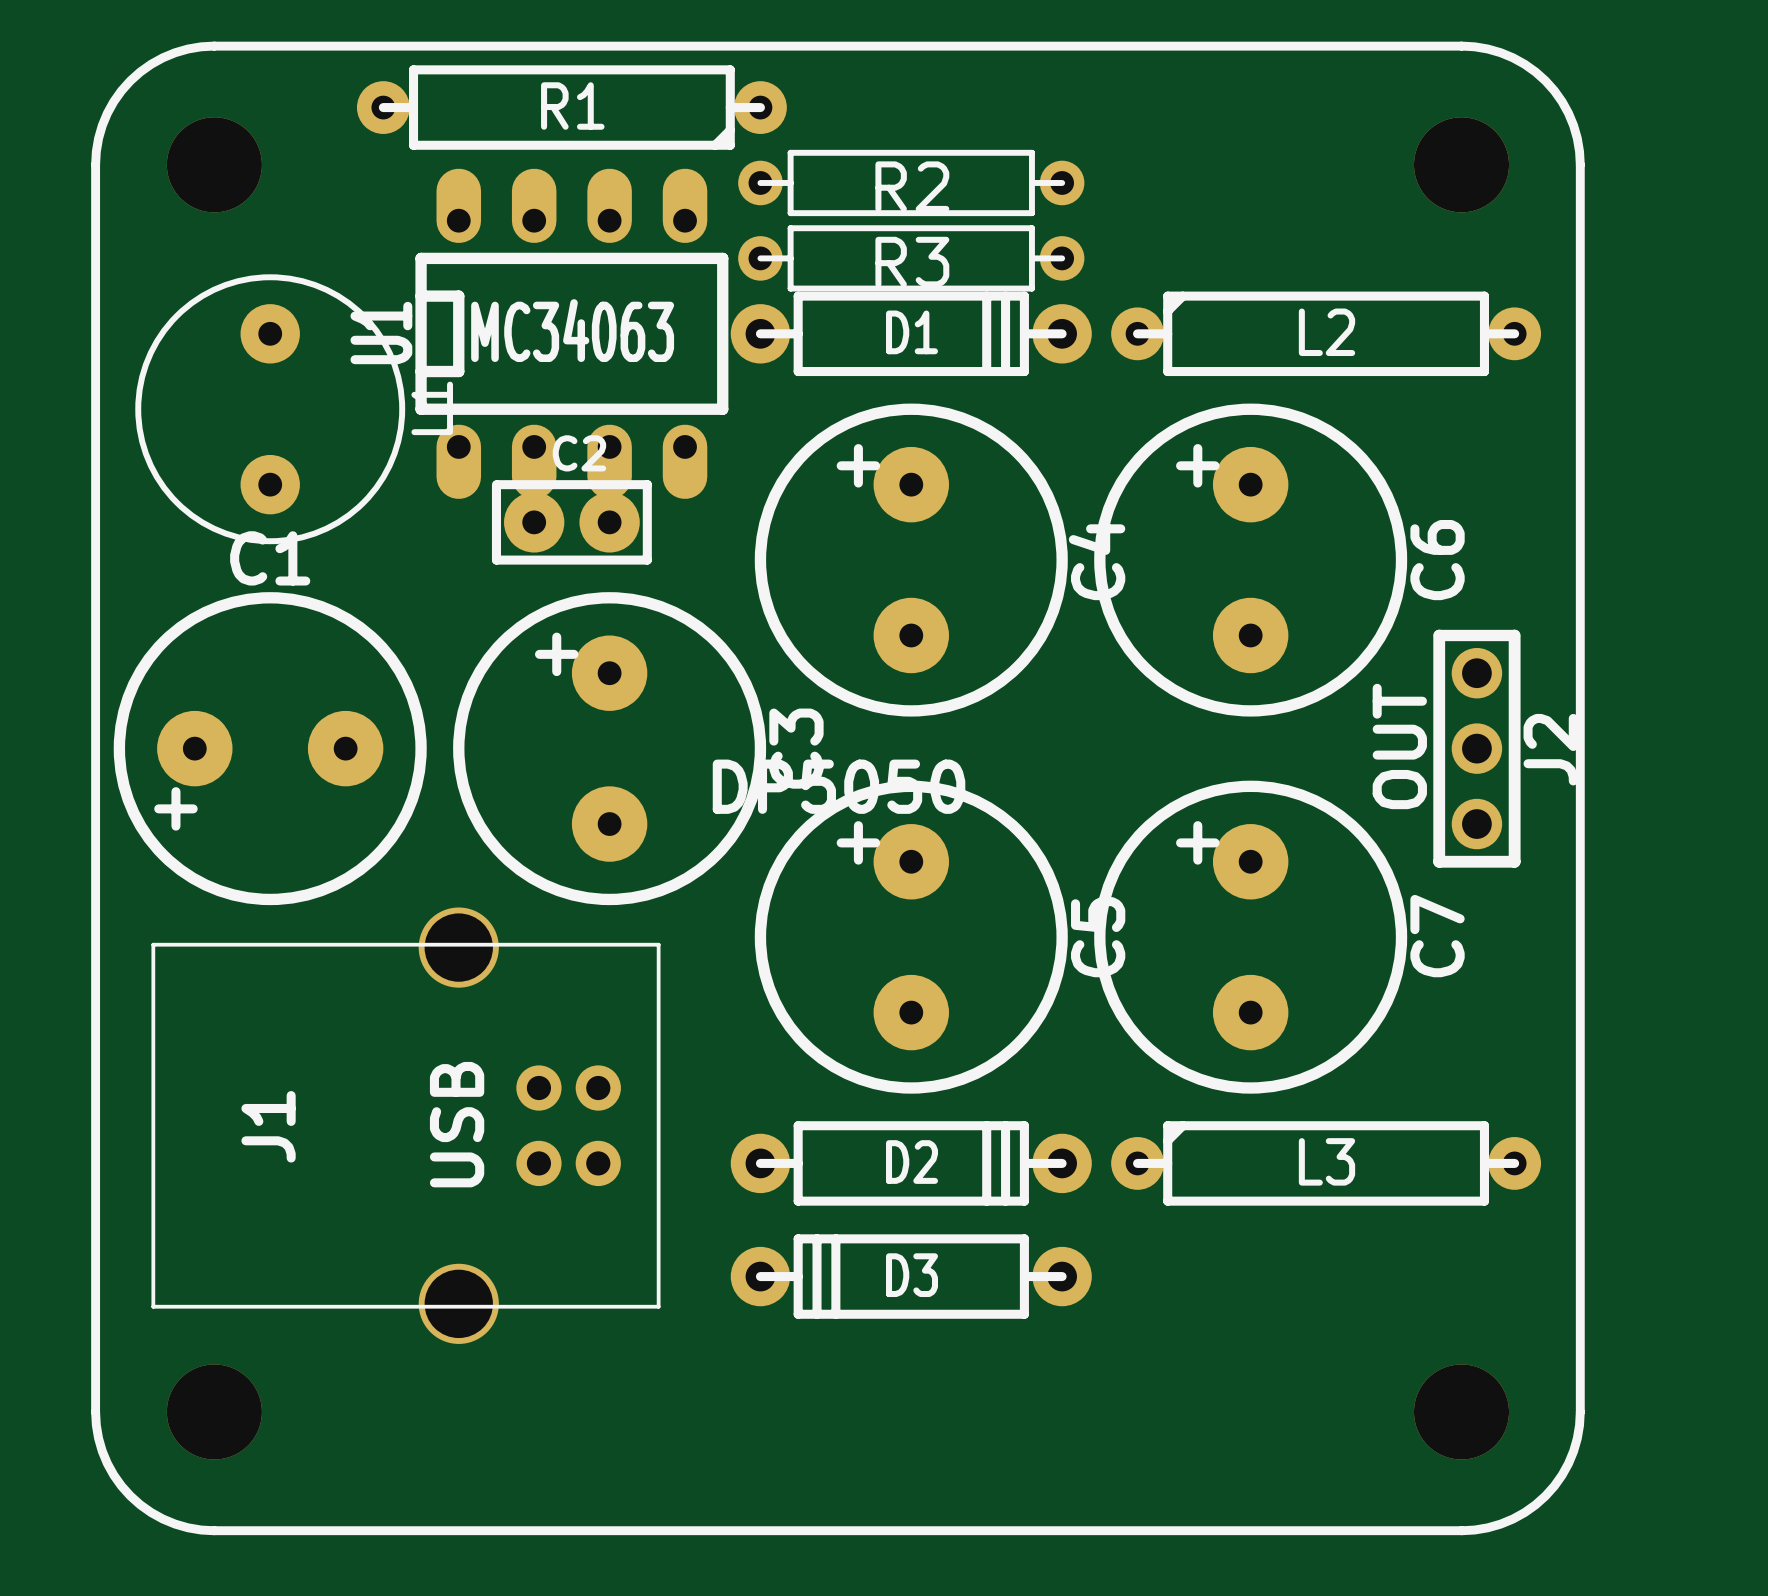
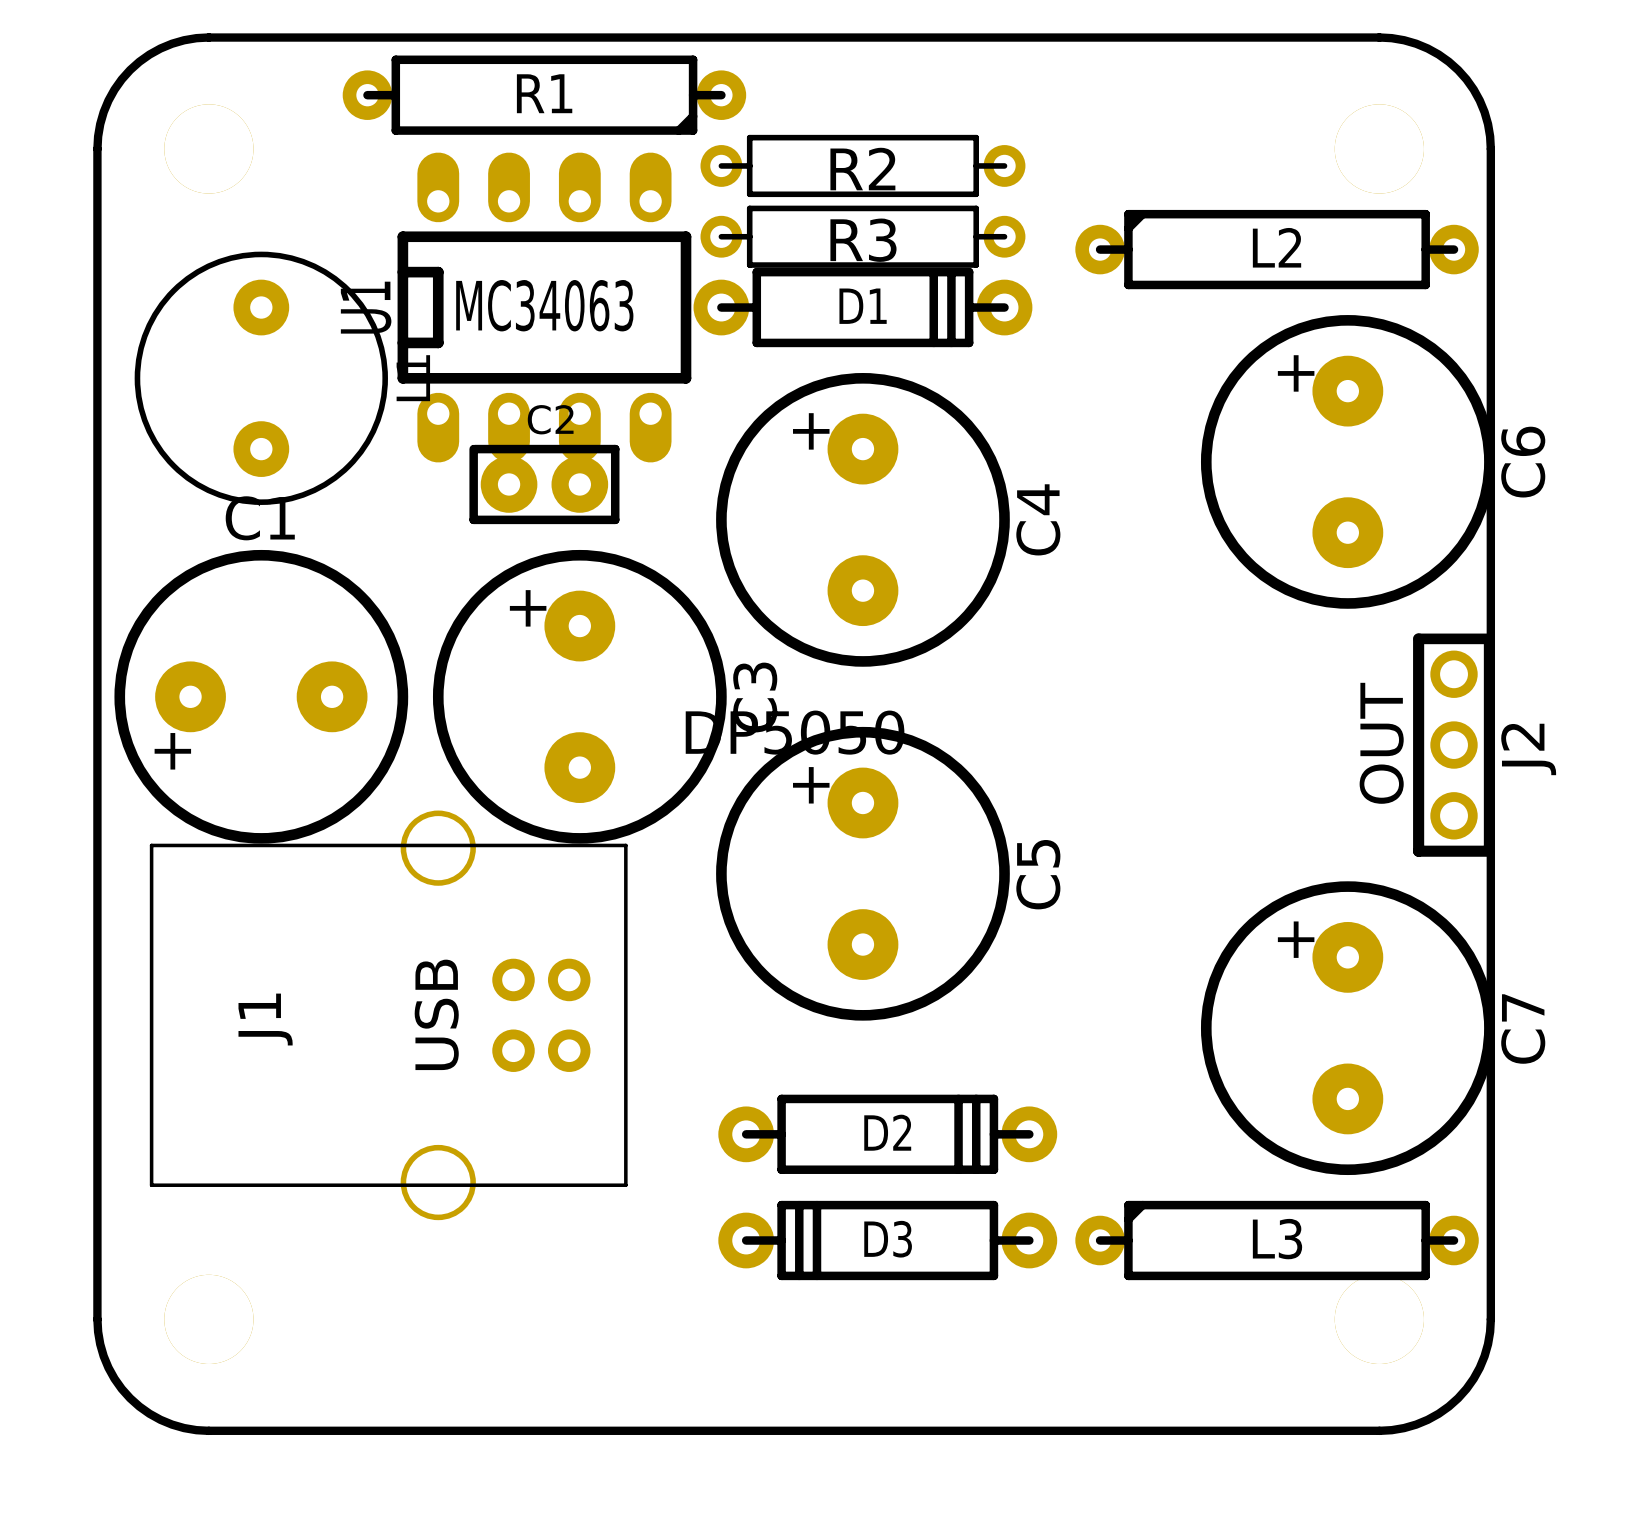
L2 position: (1326, 333) -> (1277, 249)
C6 position: (1250, 560) -> (1347, 461)
J2 position: (1476, 748) -> (1454, 745)
C7 position: (1250, 937) -> (1347, 1028)
J1 position: (405, 1125) -> (388, 1015)
D2 position: (911, 1163) -> (887, 1134)
L3 position: (1326, 1163) -> (1277, 1240)
D3 position: (911, 1276) -> (887, 1240)

